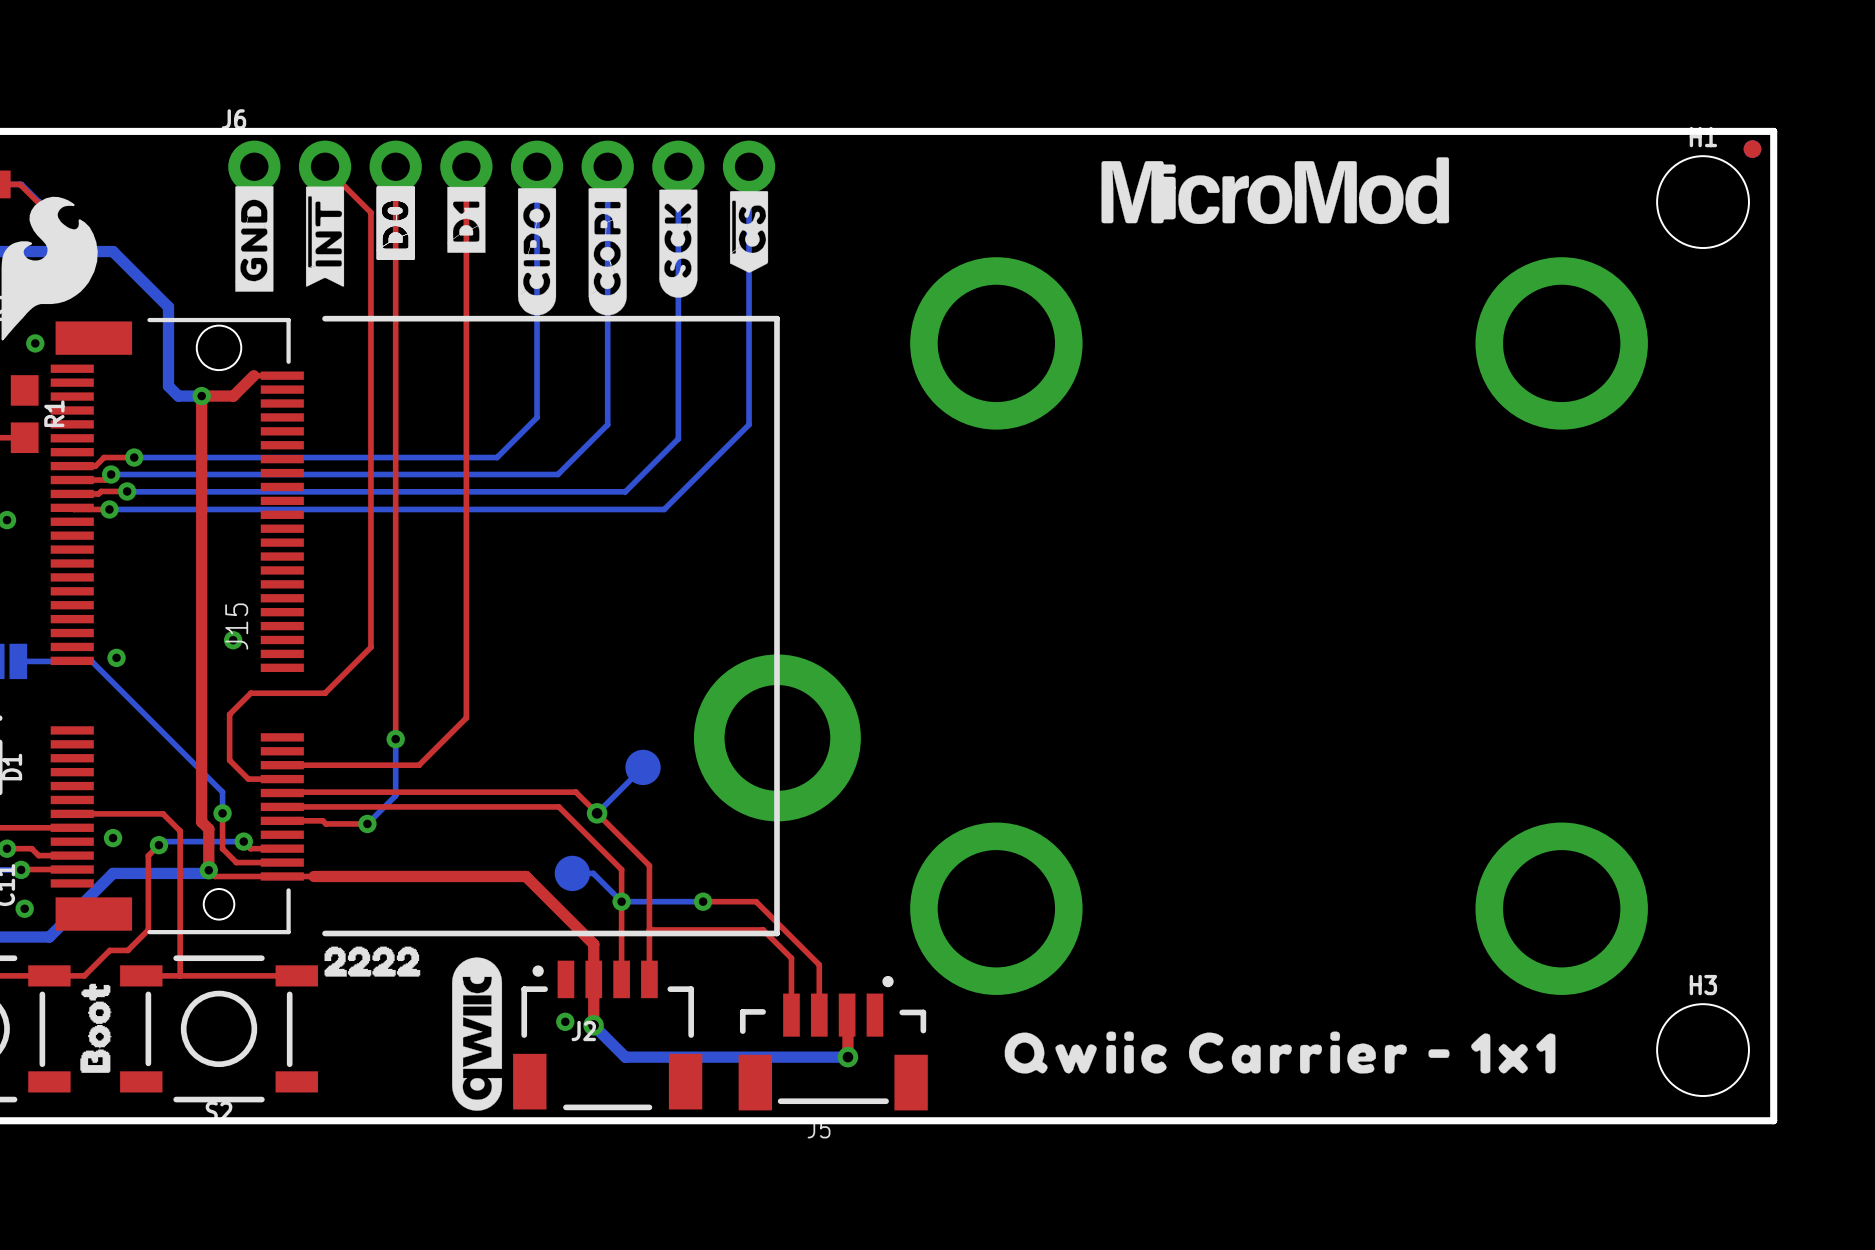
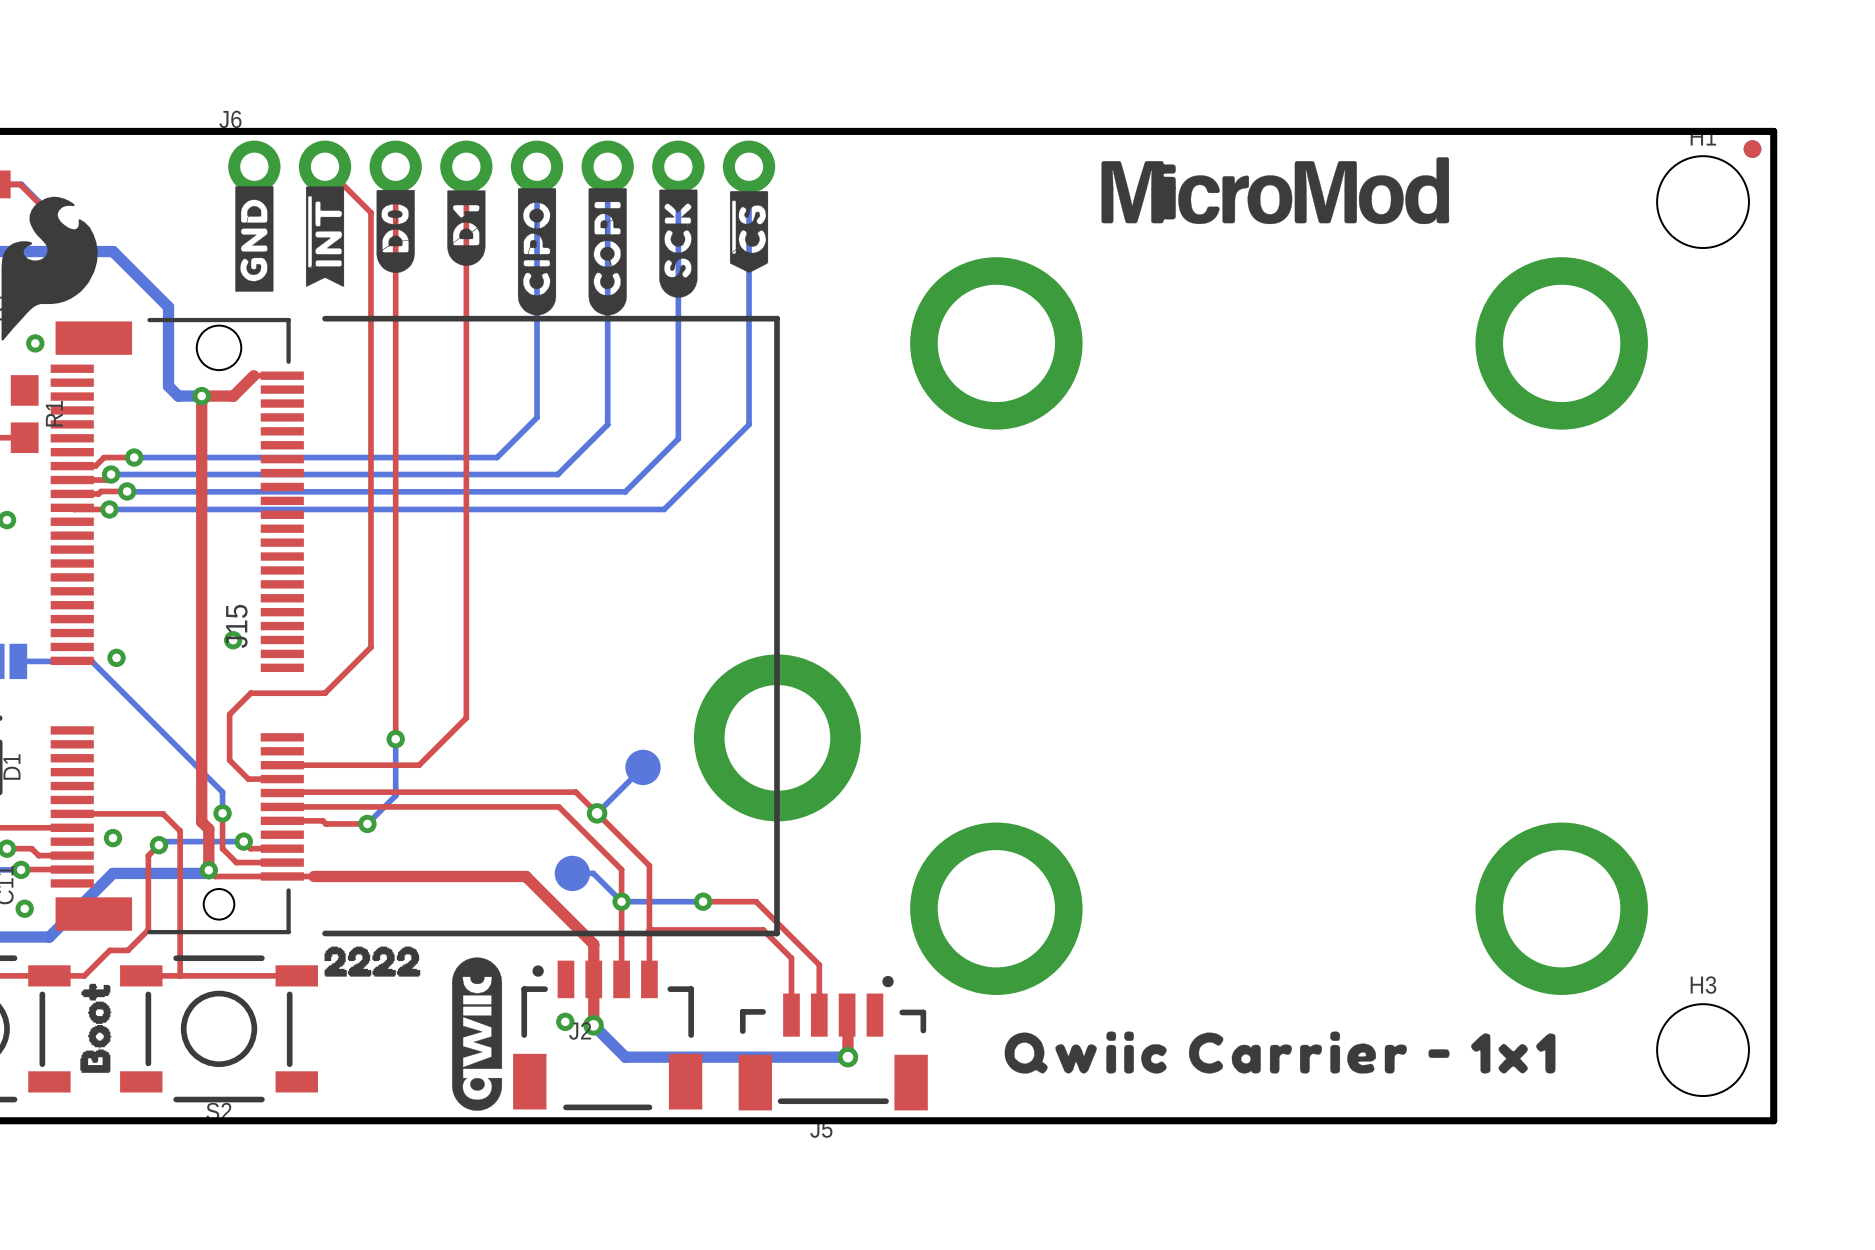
drawing shape: [376, 186, 415, 260] -> [376, 189, 415, 273]
drawing shape: [447, 186, 486, 253] -> [447, 190, 486, 266]

